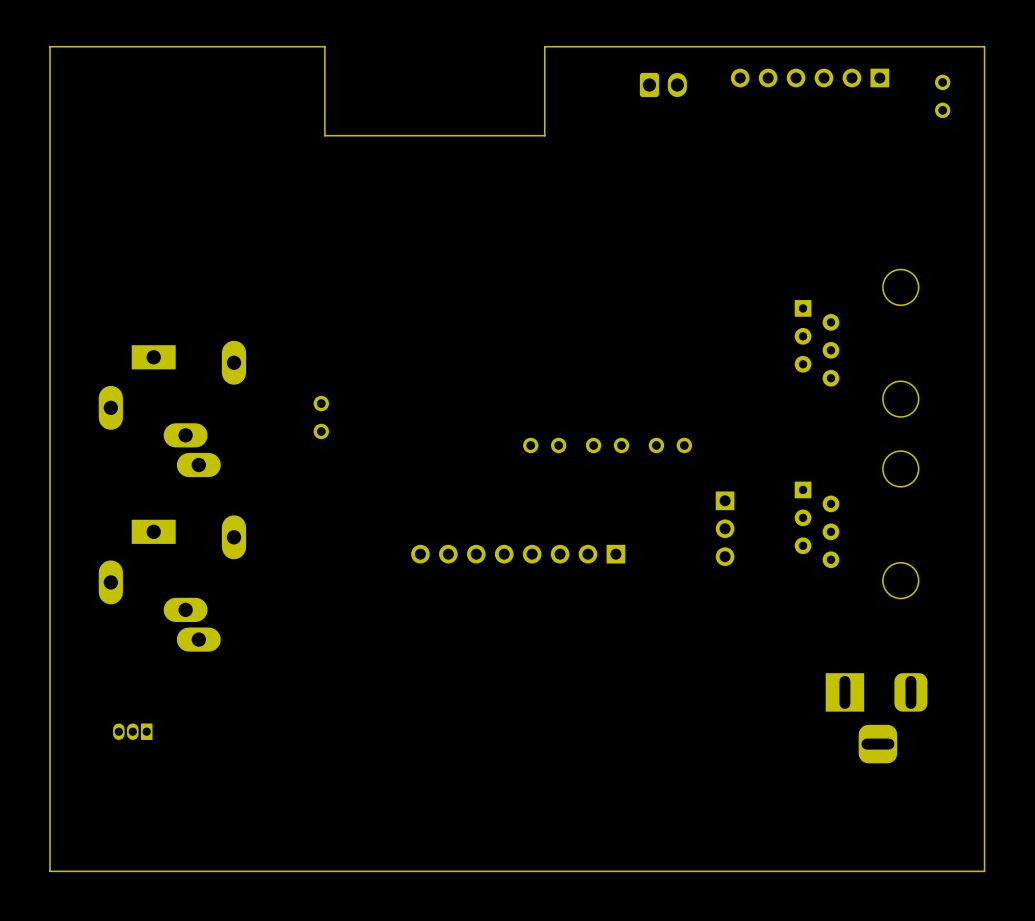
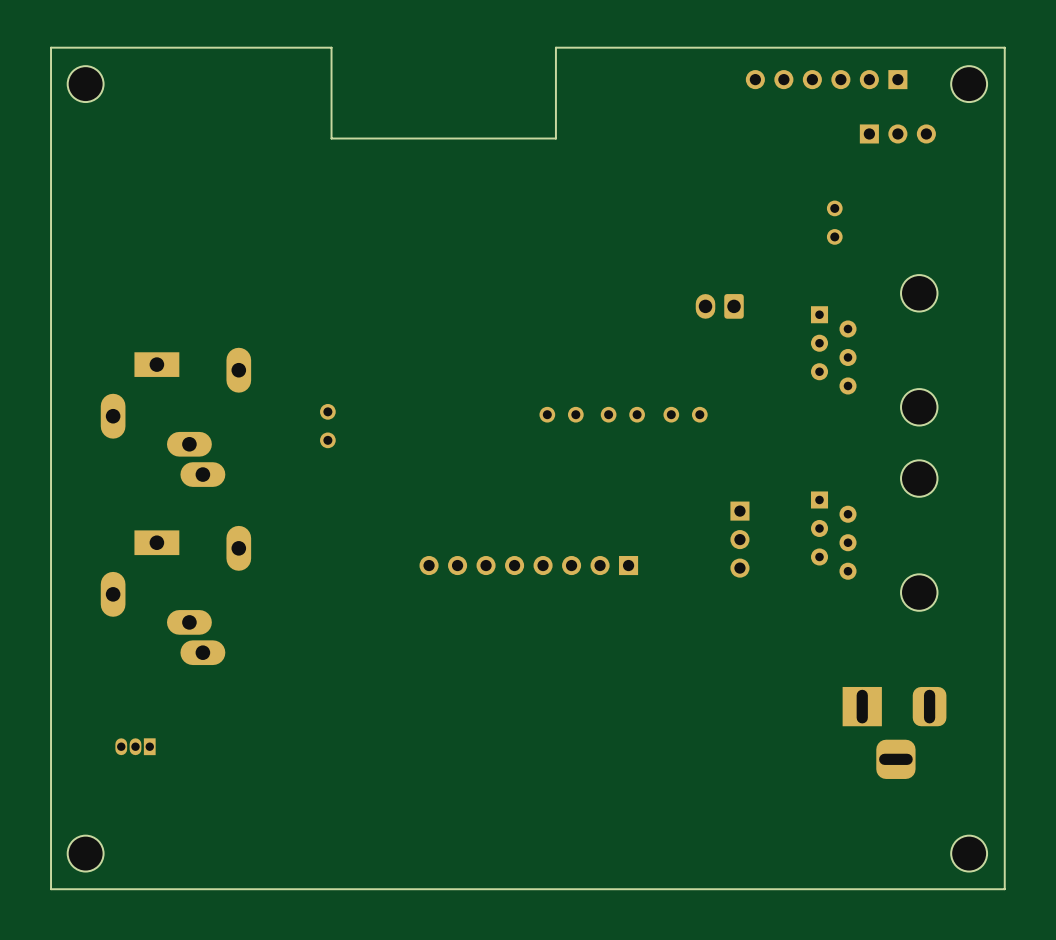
part: none -> (85, 84)
part: none -> (969, 84)
part rotation: 0° (663, 84) -> 180° (719, 306)
part position: (663, 84) -> (719, 306)
part: (942, 96) -> none
part: none -> (897, 133)
part: none -> (834, 222)
part: none -> (561, 414)
part: none -> (622, 414)
part: none -> (685, 414)
part: (544, 445) -> none
part: (607, 445) -> none
part: (670, 445) -> none
part: none -> (85, 853)
part: none -> (969, 853)

